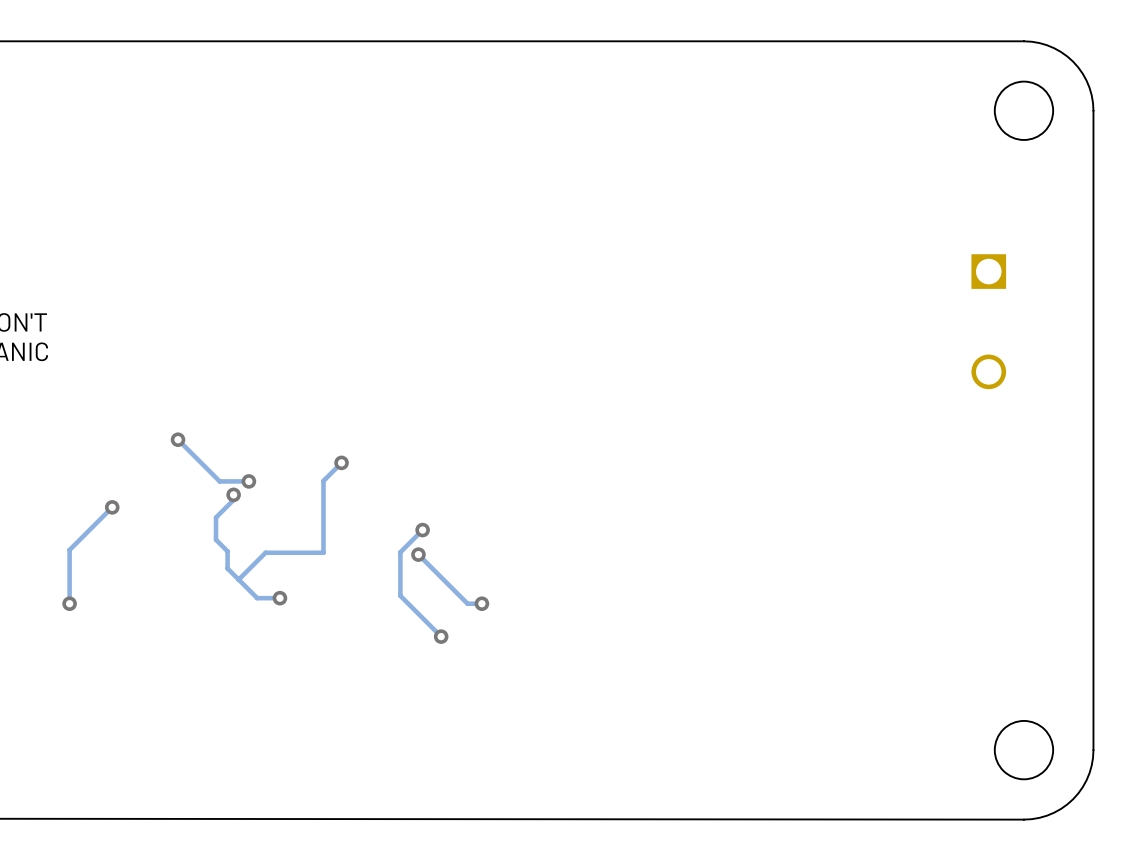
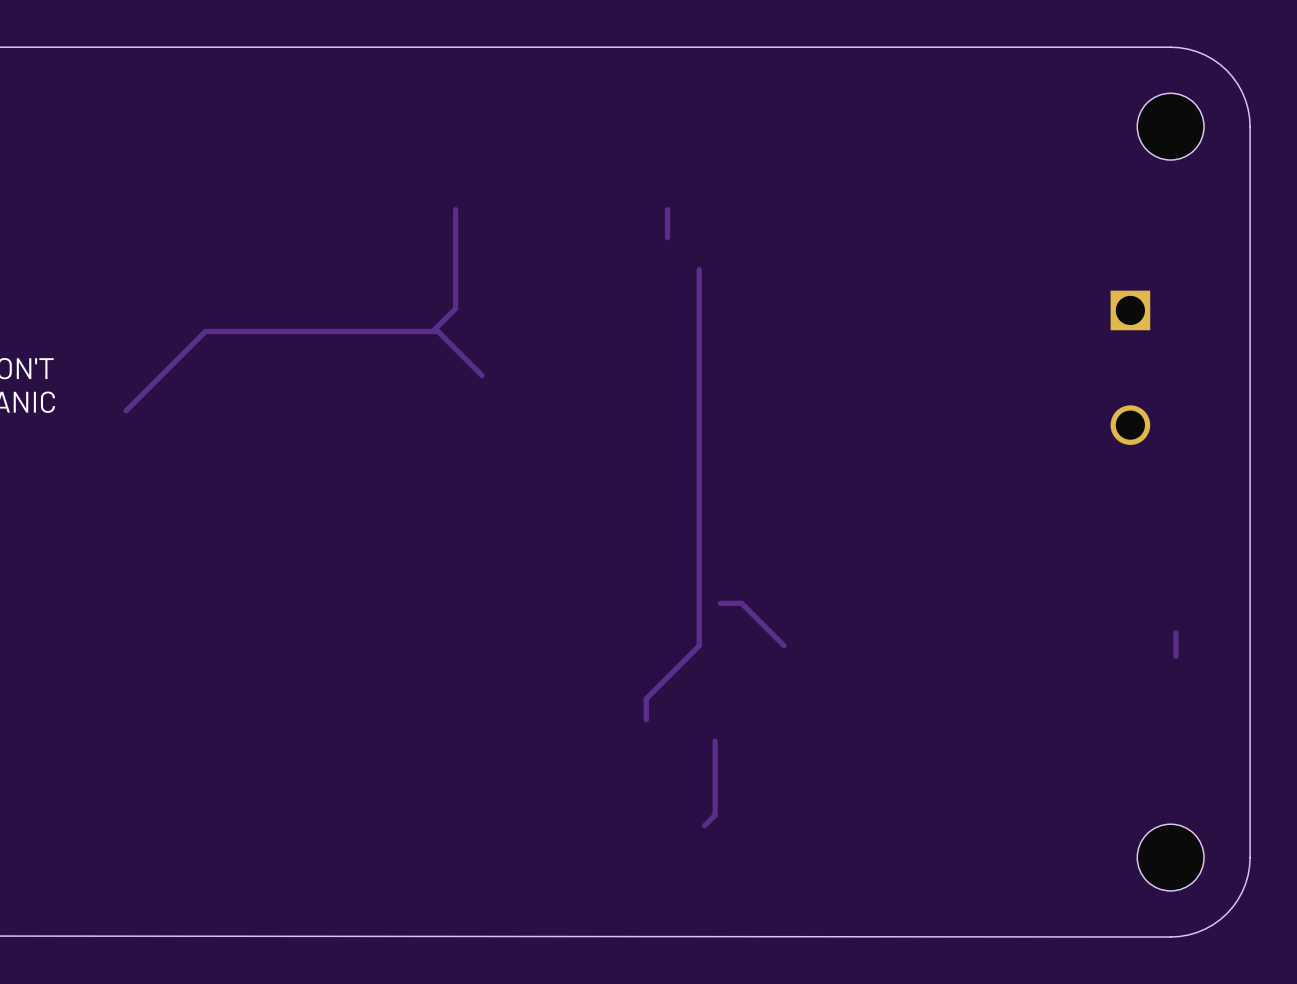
track: none -> (455, 209) (455, 308) (432, 331)
track: none -> (667, 209) (667, 237)
track: none -> (699, 269) (699, 645) (646, 698) (646, 719)
track: none -> (482, 375) (438, 331) (205, 331) (126, 410)
track: (178, 439) (219, 481) (248, 481) -> none
via: (178, 439) -> none
track: (341, 462) (323, 480) (323, 552) (265, 552) (238, 579) -> none
via: (341, 462) -> none
via: (248, 481) -> none
track: (233, 494) (233, 499) (216, 517) (216, 539) (227, 551) (227, 568) (257, 598) (279, 598) -> none
via: (233, 494) -> none
track: (112, 507) (69, 549) (69, 603) -> none
via: (112, 507) -> none
track: none -> (720, 603) (741, 603) (784, 645)
via: (422, 530) -> none
track: (422, 533) (422, 530) (400, 552) (400, 595) (441, 636) -> none
track: none -> (1175, 632) (1175, 656)
track: (418, 554) (467, 603) (481, 603) -> none
via: (418, 554) -> none
via: (279, 598) -> none
via: (69, 603) -> none
via: (481, 603) -> none
via: (441, 636) -> none
track: none -> (715, 741) (715, 815) (704, 825)

